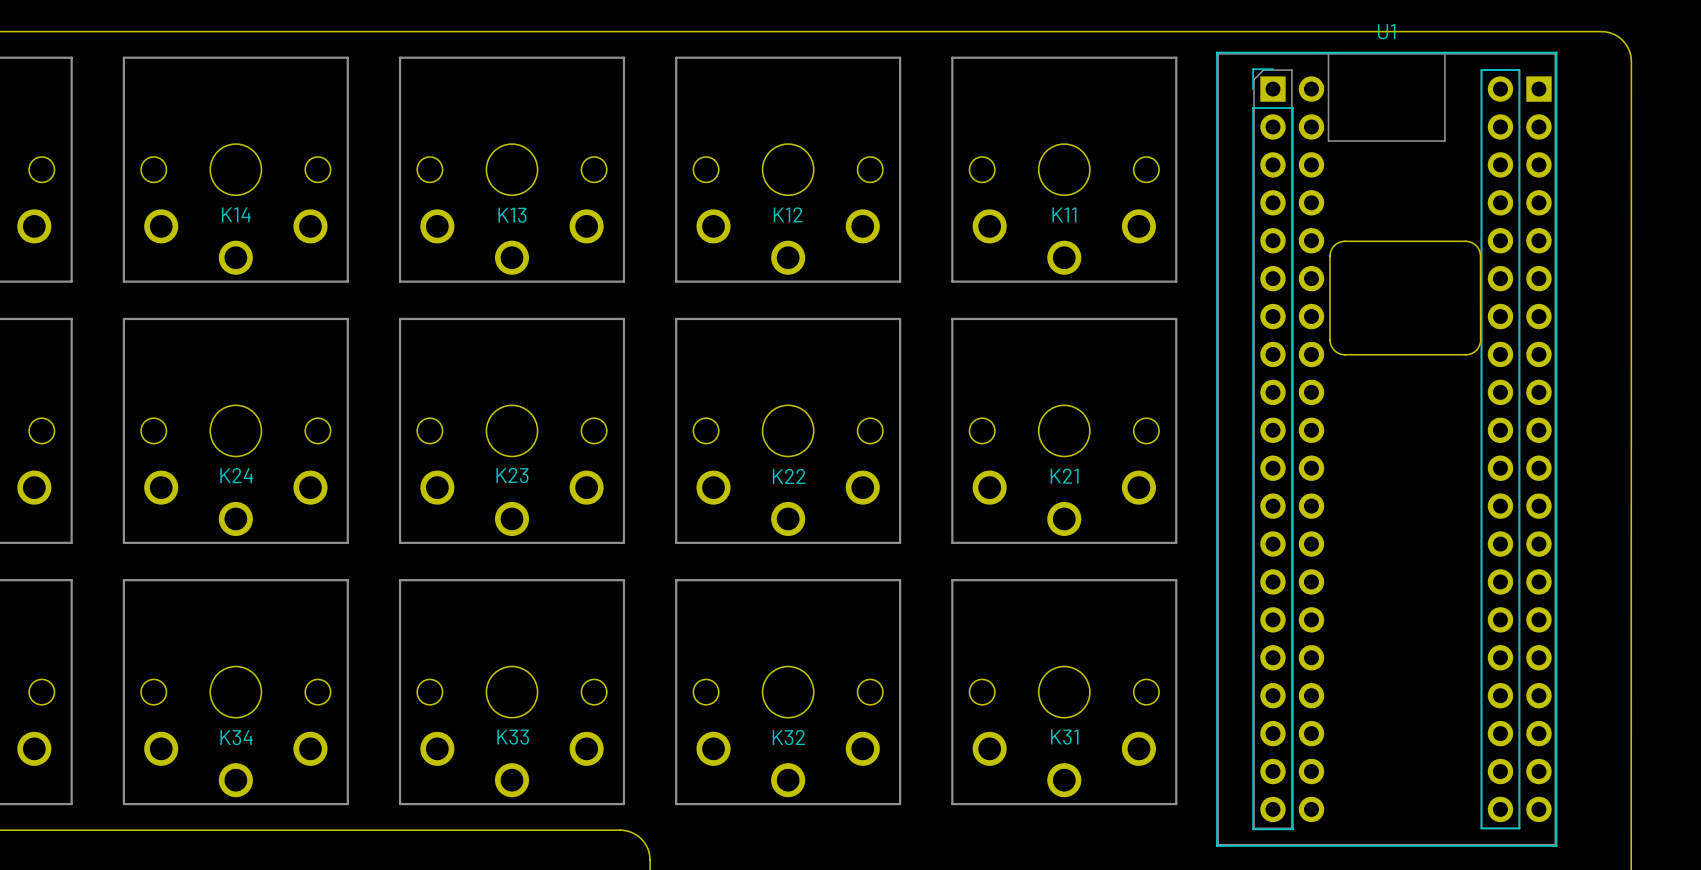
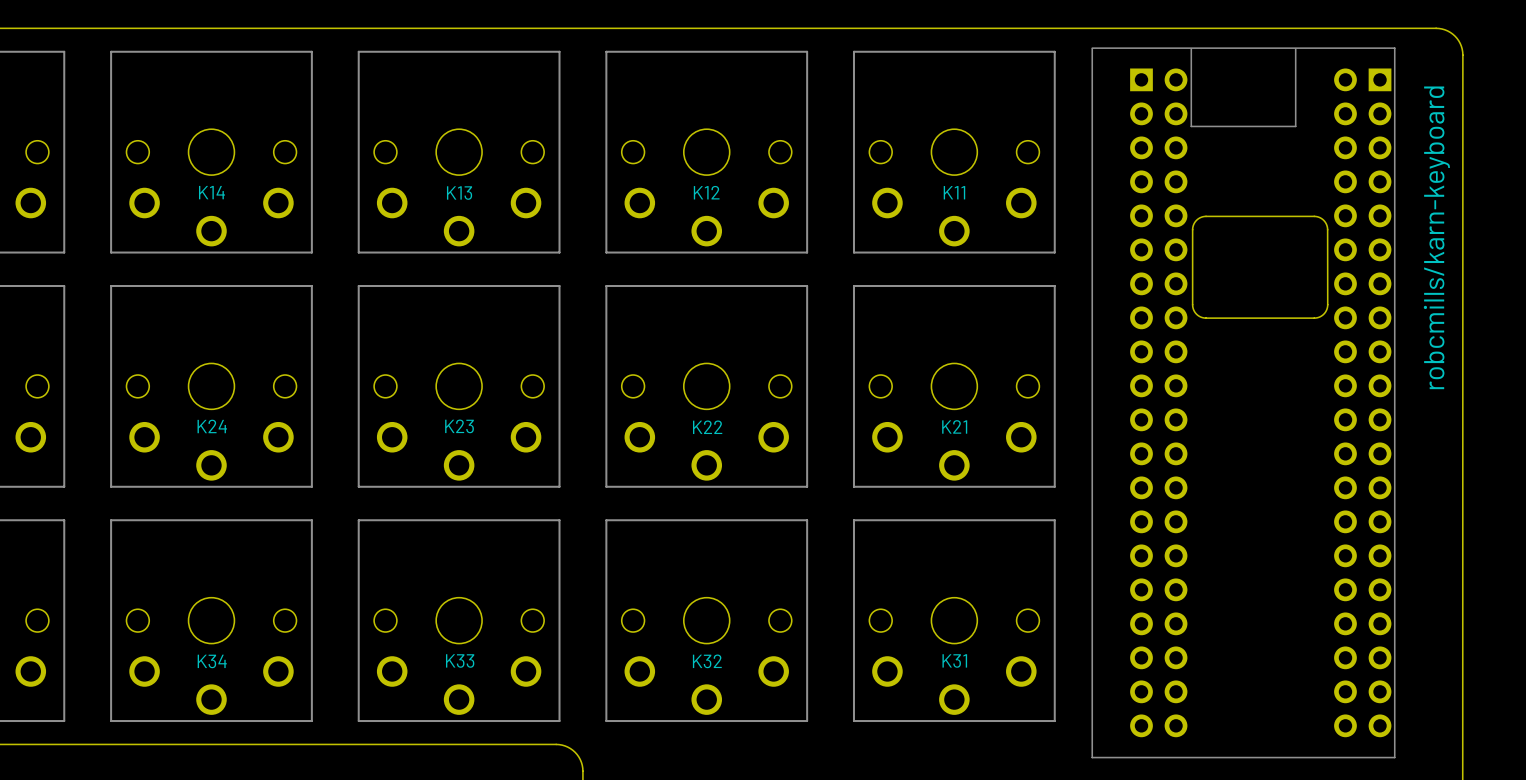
text: none -> robcmills/karn-keyboard (1436, 237)
U1: (1386, 449) -> none
part: none -> (1243, 402)

